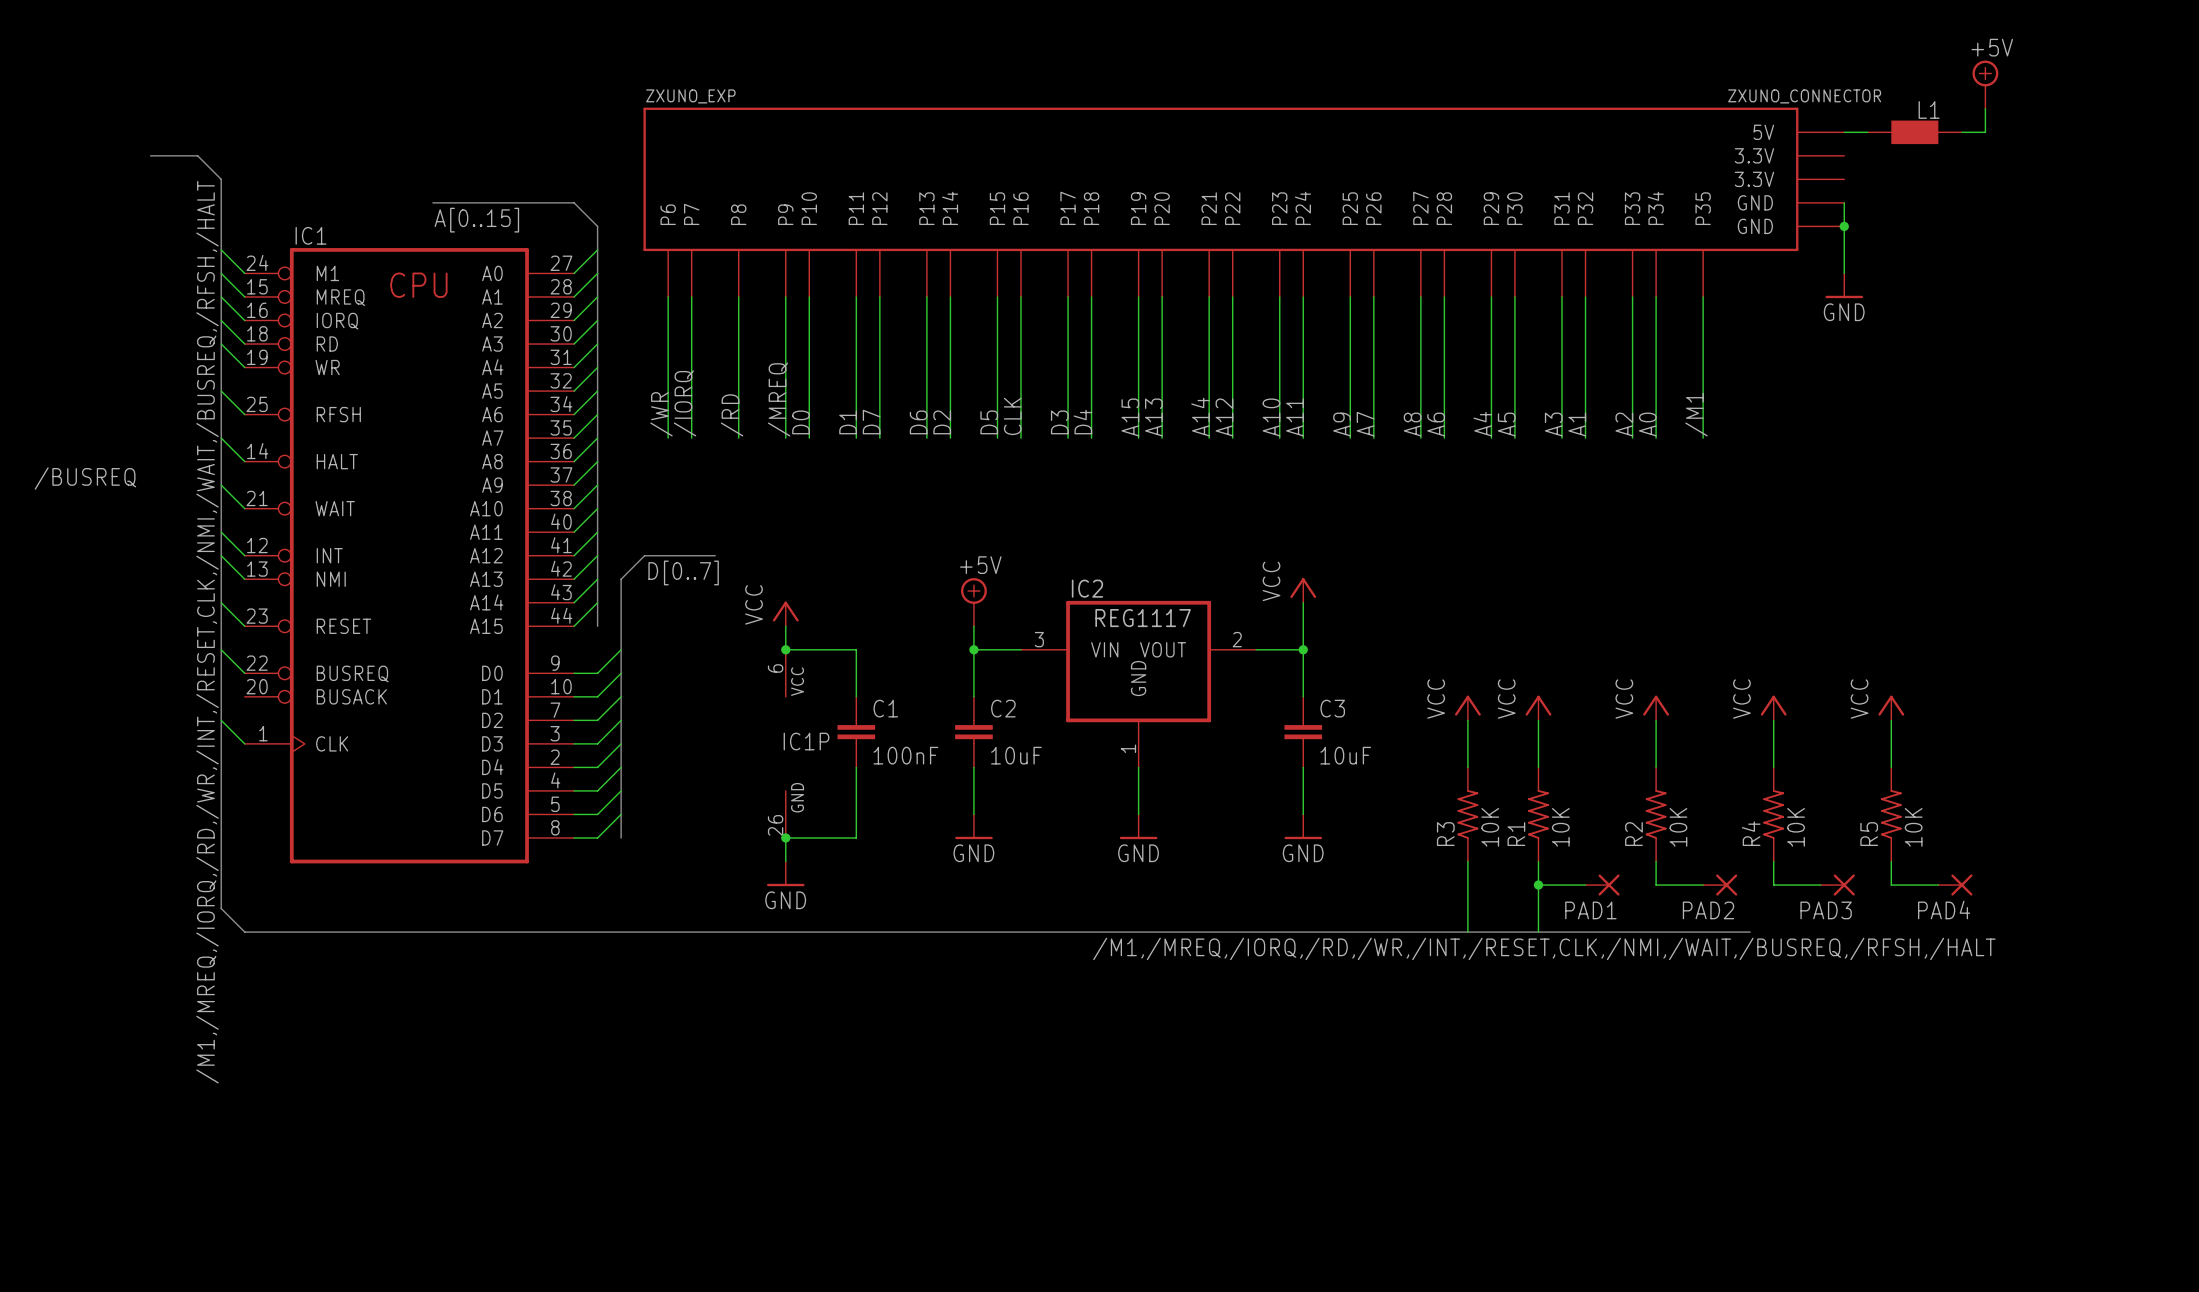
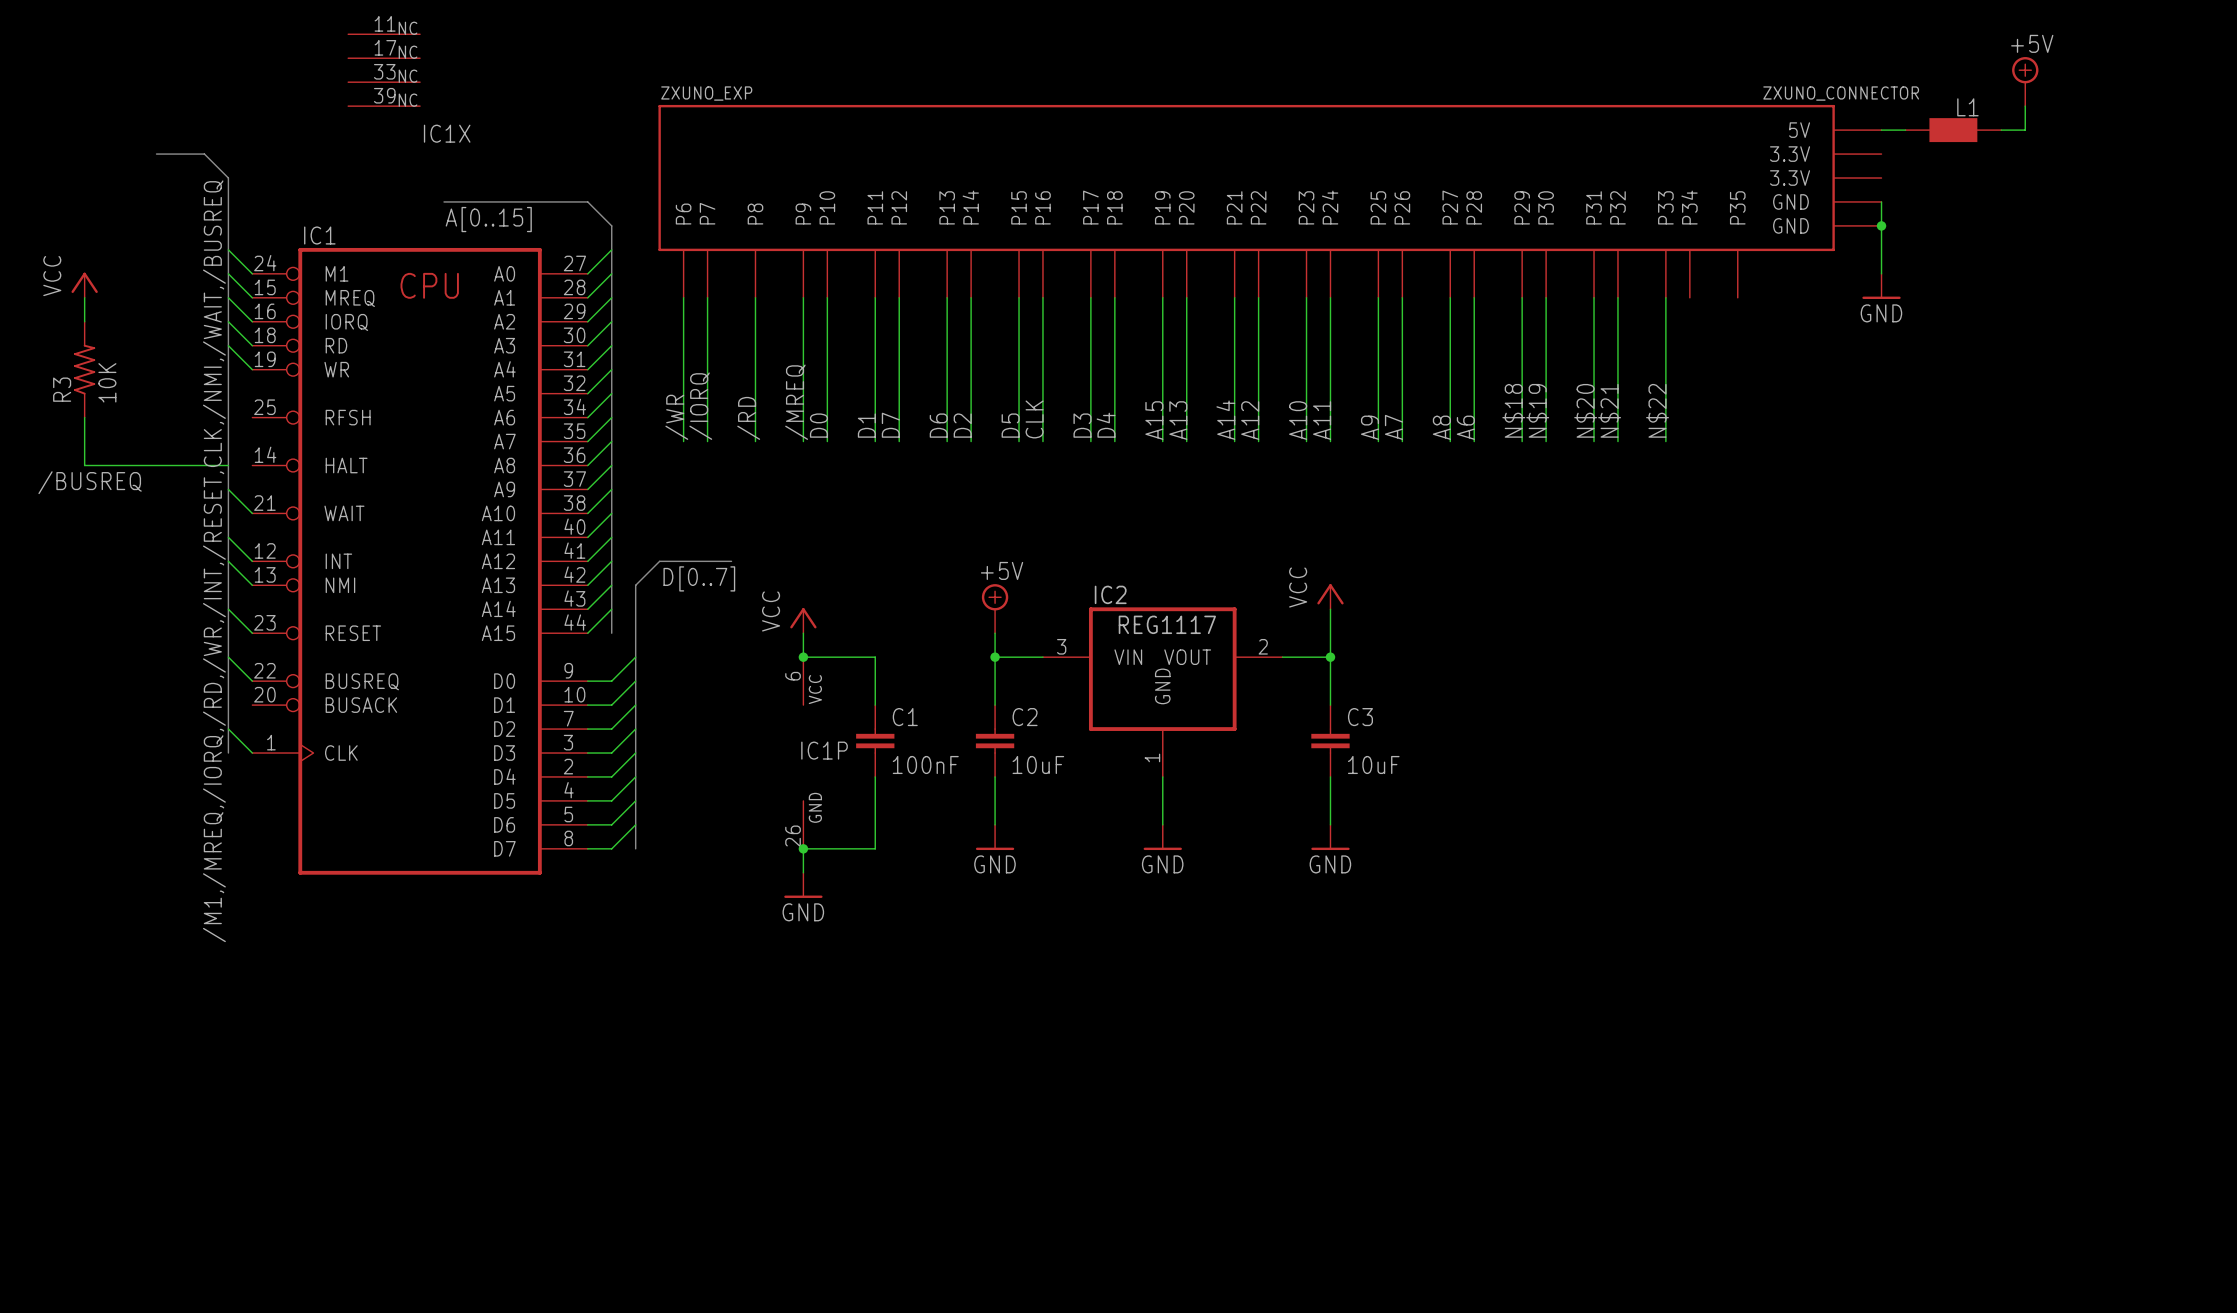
IC1X: none -> (384, 70)
power symbol: none -> VCC (84, 285)
wire: none -> (84, 297) (84, 321)
wire: (1656, 296) (1656, 438) -> none
wire: (1703, 296) (1703, 438) -> none
wire: (221, 391) (244, 414) -> none
wire: none -> (84, 417) (84, 465) (228, 465)
label: /M1 (1696, 414) -> none
label: A4 (1482, 424) -> N$18 (1513, 410)
label: A5 (1506, 424) -> N$19 (1537, 410)
label: A3 (1553, 424) -> N$20 (1585, 410)
label: A1 (1577, 424) -> N$21 (1609, 410)
label: A2 (1624, 424) -> N$22 (1657, 410)
label: A0 (1647, 424) -> none
wire: (221, 438) (244, 461) -> none
label: /M1,/MREQ,/IORQ,/RD,/WR,/INT,/RESET,CLK,/NMI,/WAIT,/BUSREQ,/RFSH,/HALT (207, 632) -> /M1,/MREQ,/IORQ,/RD,/WR,/INT,/RESET,CLK,/NMI,/WAIT,/BUSREQ (214, 561)
power symbol: VCC (1467, 708) -> none
power symbol: VCC (1538, 708) -> none
power symbol: VCC (1656, 708) -> none
power symbol: VCC (1773, 708) -> none
power symbol: VCC (1891, 708) -> none
wire: (1467, 720) (1467, 767) -> none
wire: (1538, 720) (1538, 767) -> none
wire: (1656, 720) (1656, 767) -> none
wire: (1773, 720) (1773, 767) -> none
wire: (1891, 720) (1891, 767) -> none
bus: (221, 743) (221, 908) (244, 932) (1750, 932) -> none
R3 position: (1467, 814) -> (84, 369)
R1: 10K (1538, 814) -> none
R2: 10K (1656, 814) -> none
R4: 10K (1773, 814) -> none
R5: 10K (1891, 814) -> none
wire: (1467, 861) (1467, 932) -> none
wire: (1538, 861) (1538, 932) -> none
wire: (1656, 861) (1656, 885) (1703, 885) -> none
wire: (1773, 861) (1773, 885) (1820, 885) -> none
wire: (1891, 861) (1891, 885) (1938, 885) -> none
wire: (1538, 885) (1585, 885) -> none
junction: (1538, 885) -> none
PAD1: (1602, 885) -> none
PAD2: (1720, 885) -> none
PAD3: (1837, 885) -> none
PAD4: (1955, 885) -> none
label: /M1,/MREQ,/IORQ,/RD,/WR,/INT,/RESET,CLK,/NMI,/WAIT,/BUSREQ,/RFSH,/HALT (1544, 948) -> none

